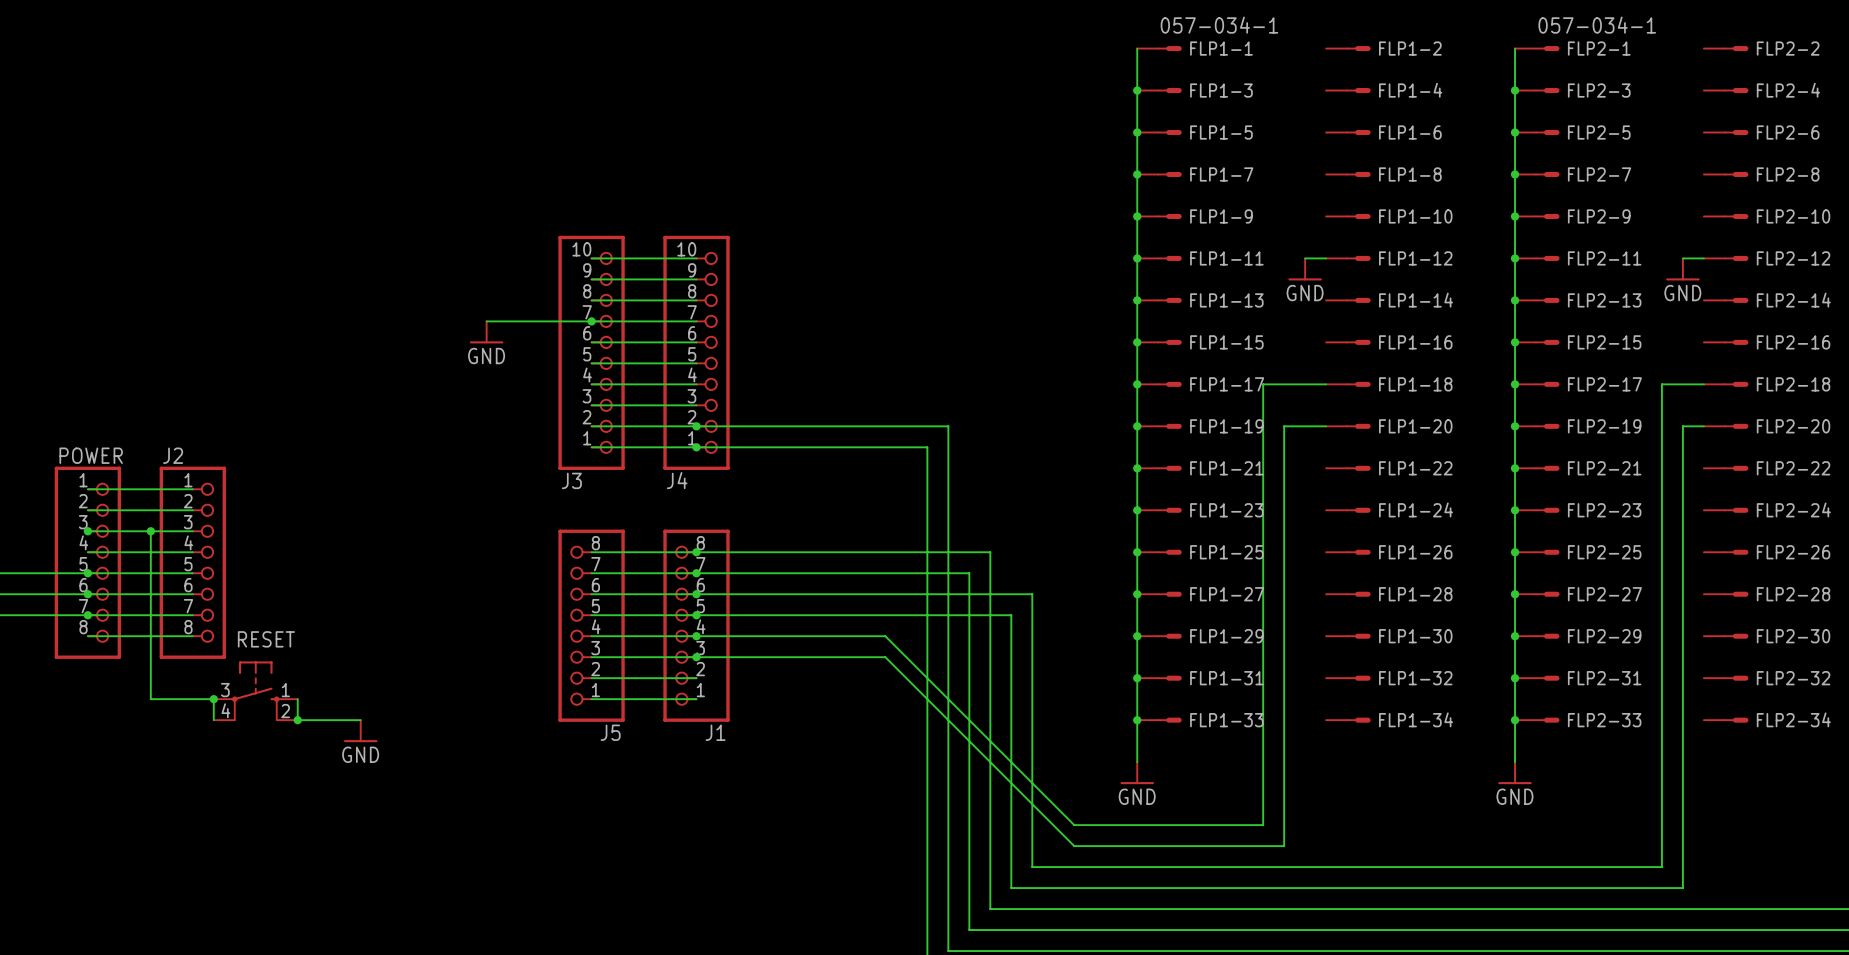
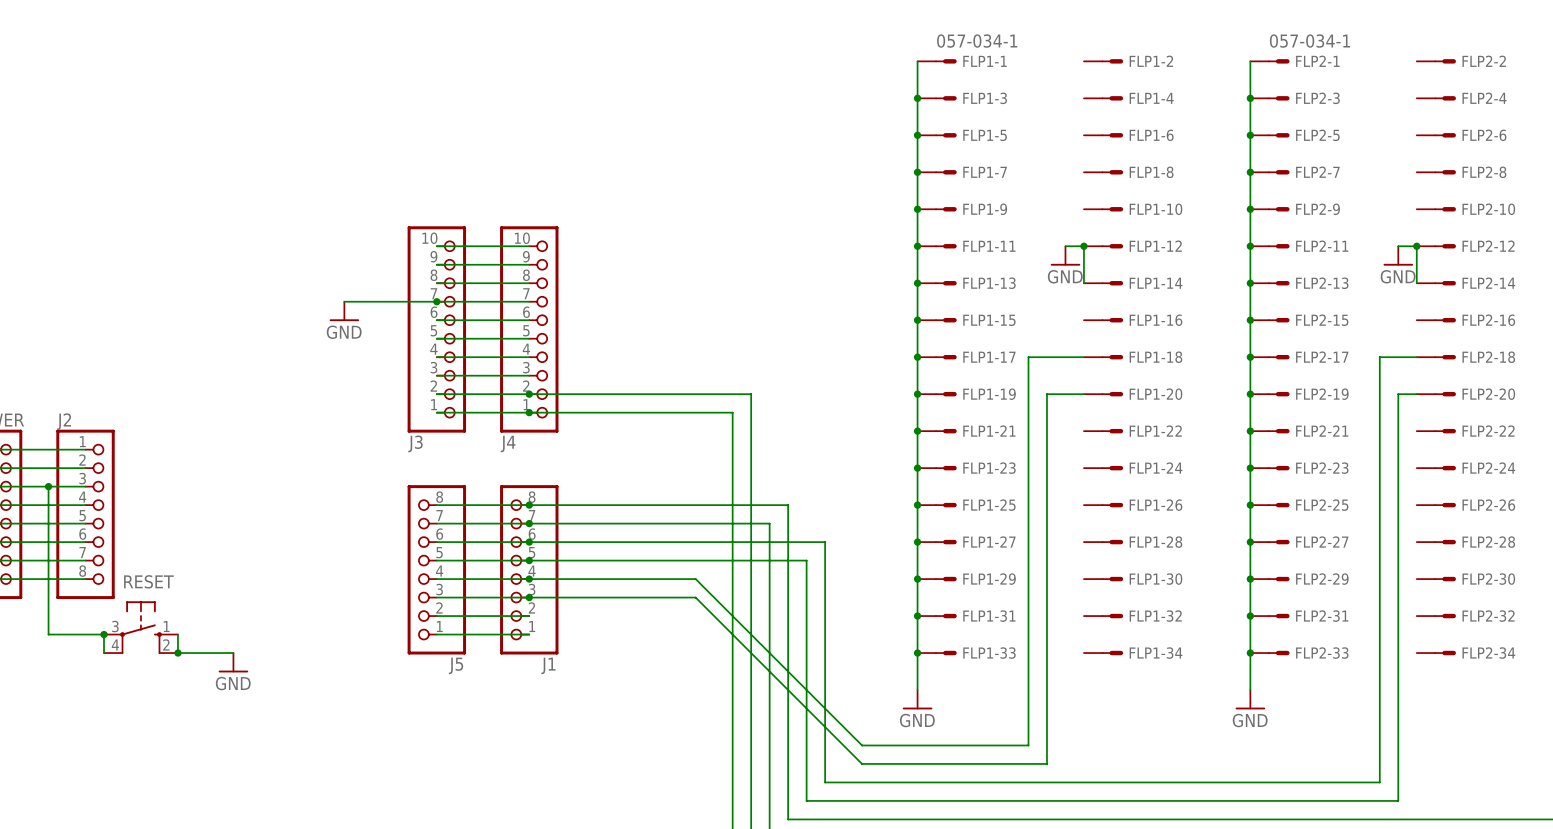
wire: none -> (1083, 246) (1083, 283)
junction: none -> (1083, 246)
wire: none -> (1416, 246) (1416, 283)
junction: none -> (1416, 246)

